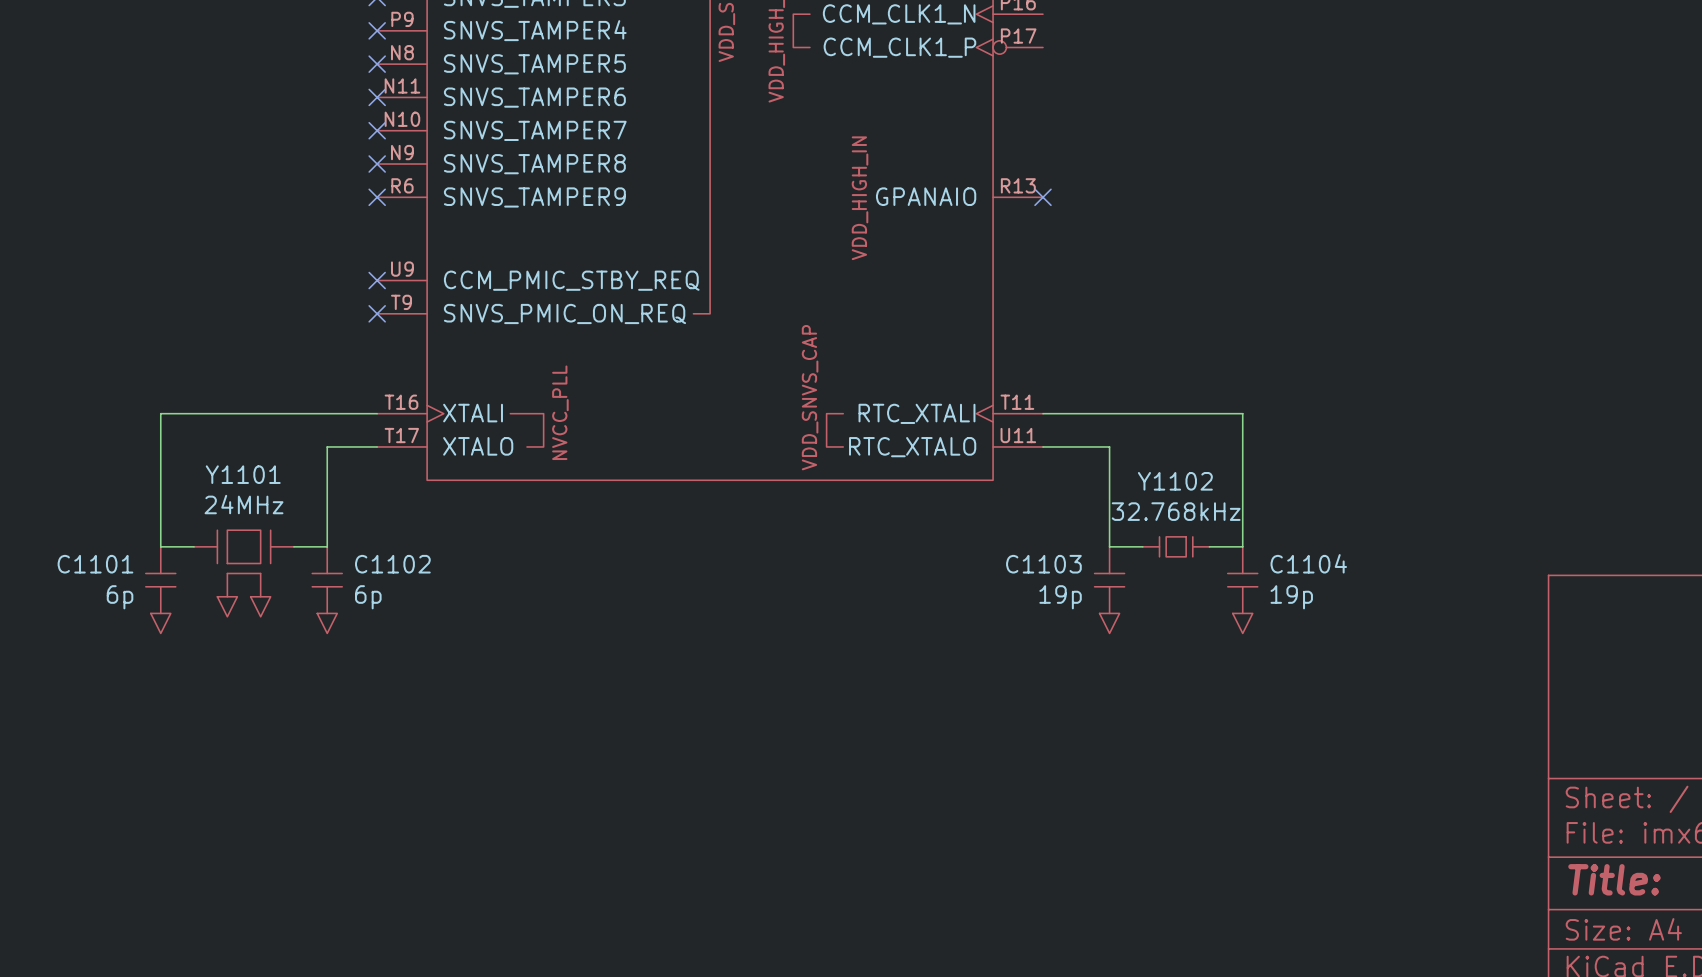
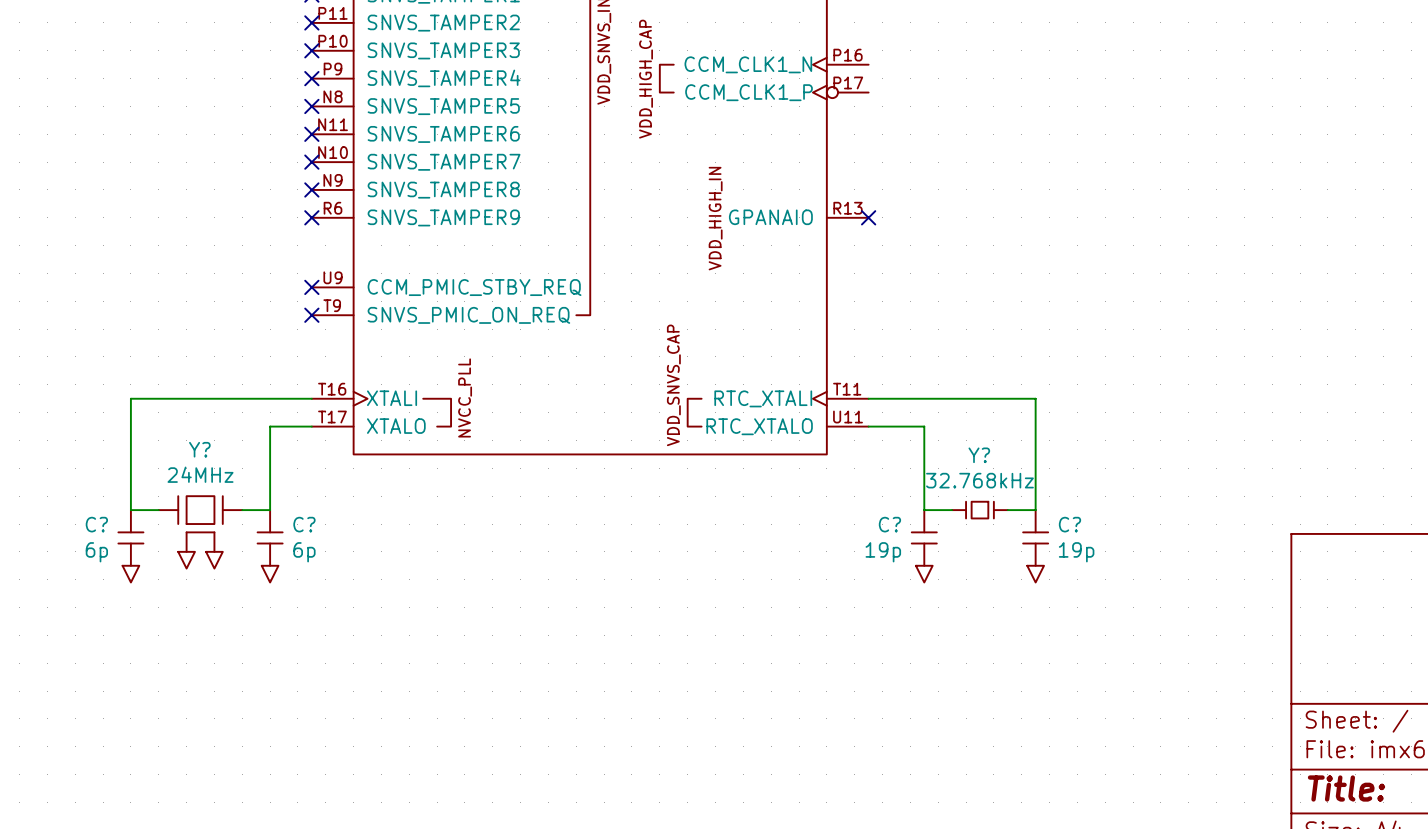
Y1101 name: Y1101 (243, 474) -> Y? (199, 449)
Y1102 name: Y1102 (1175, 481) -> Y? (979, 455)
C1104 name: C1104 (1308, 563) -> C? (1069, 524)
C1101 name: C1101 (95, 564) -> C? (96, 524)
C1102 name: C1102 (392, 564) -> C? (304, 524)
C1103 name: C1103 (1043, 564) -> C? (889, 524)

